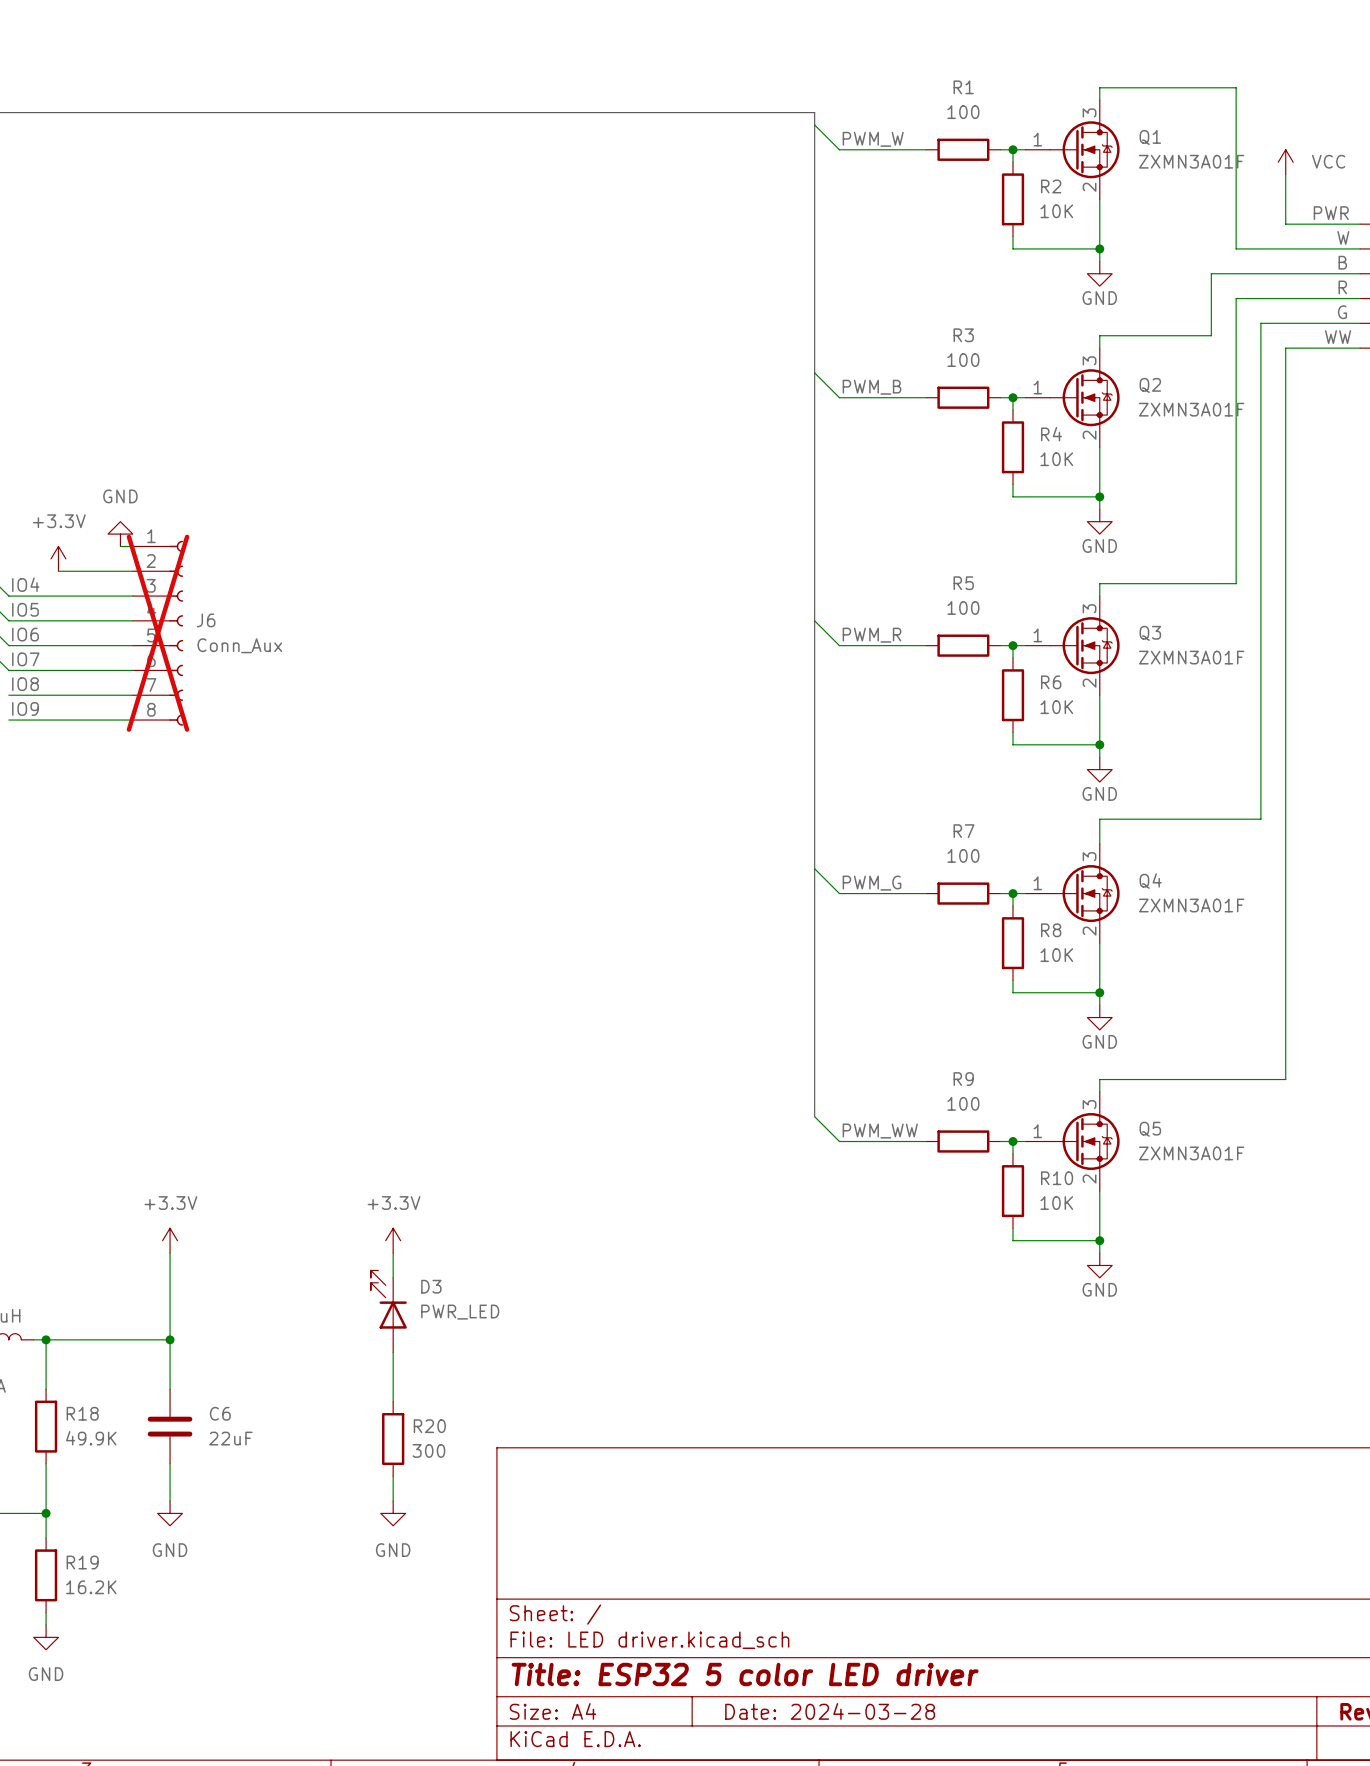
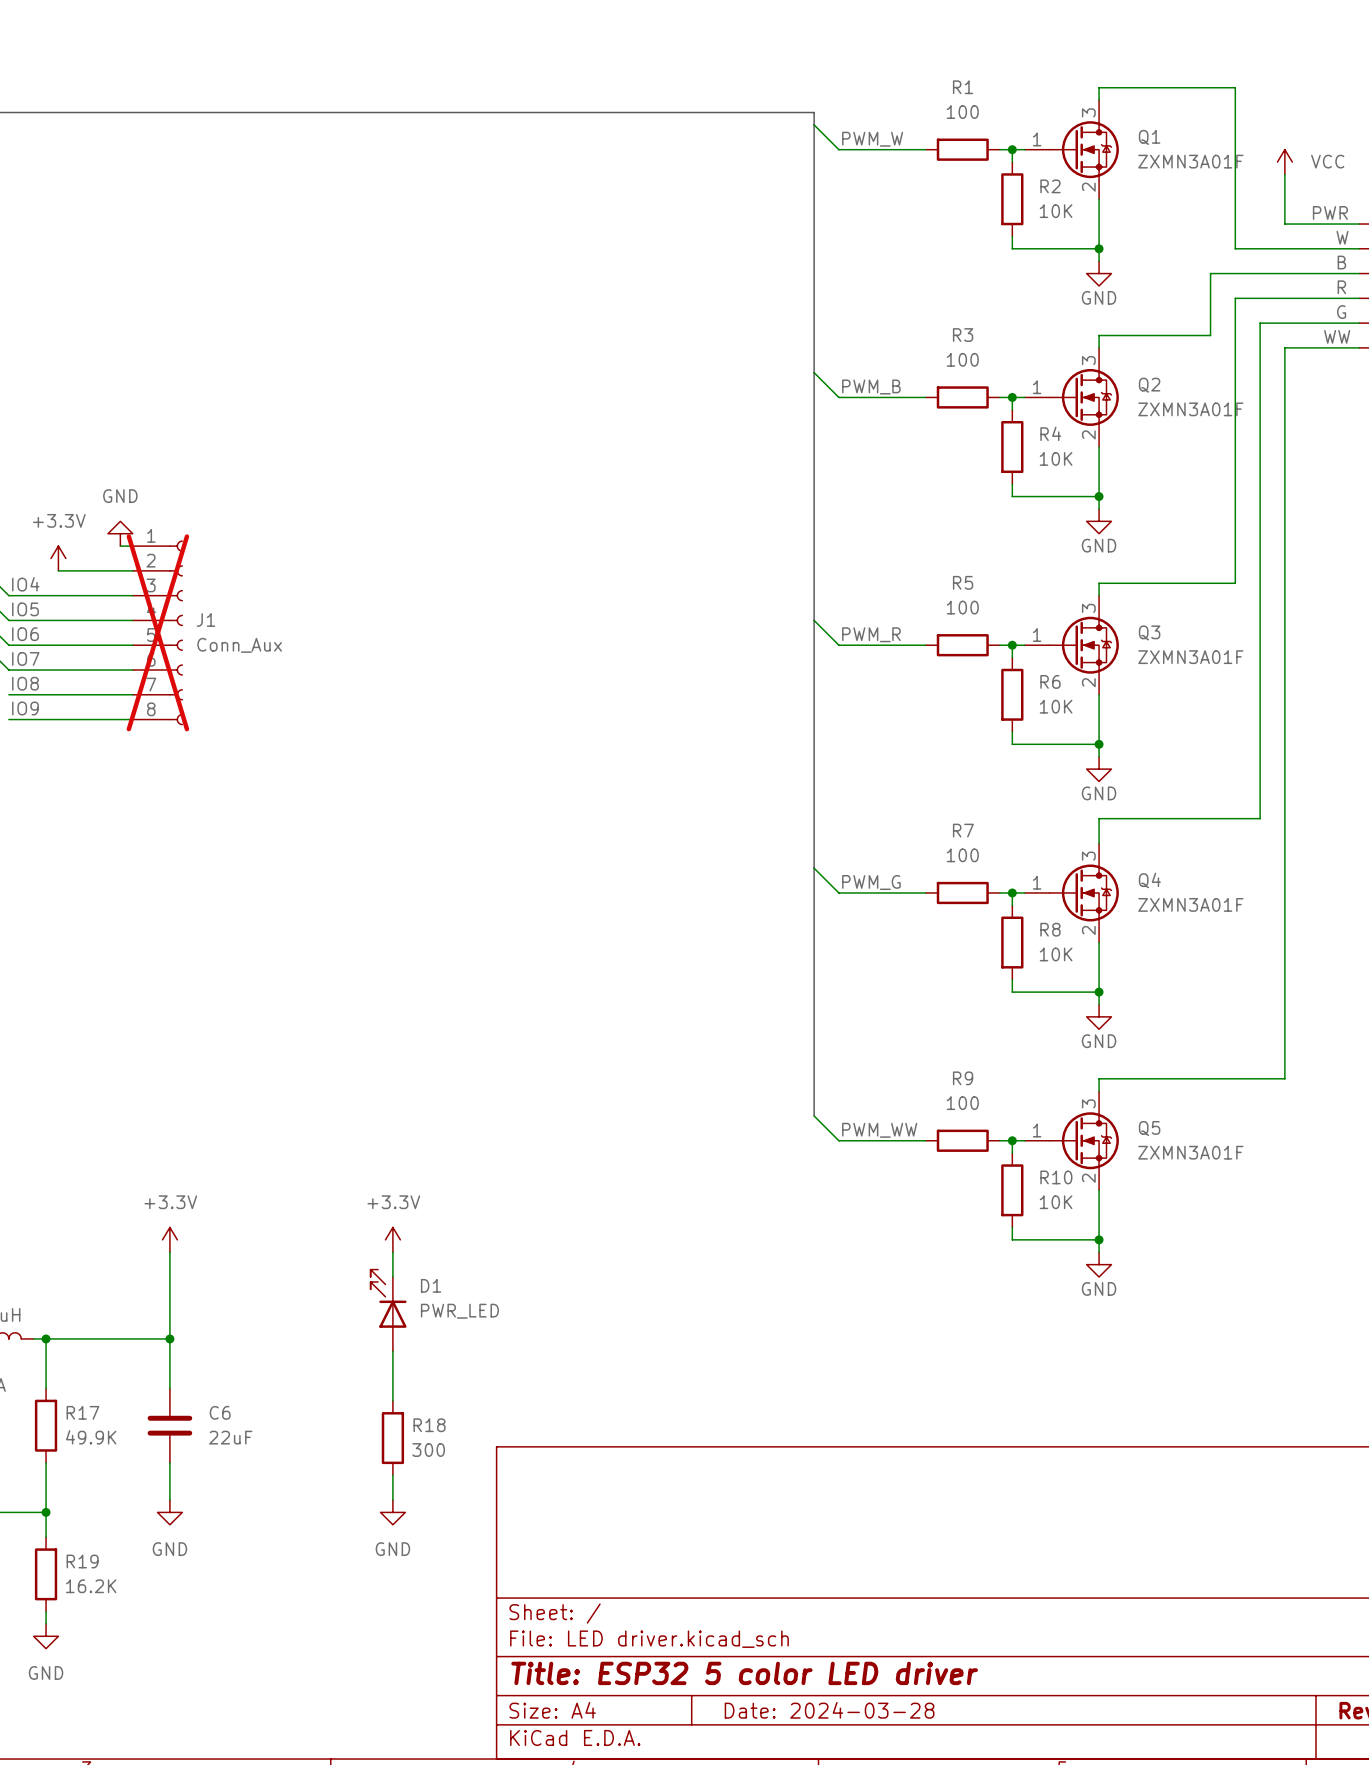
J6 name: J6 (206, 620) -> J1 (206, 619)
D3 name: D3 (431, 1286) -> D1 (431, 1285)
R18 name: R18 (82, 1413) -> R17 (82, 1412)
R20 name: R20 (429, 1426) -> R18 (429, 1425)

